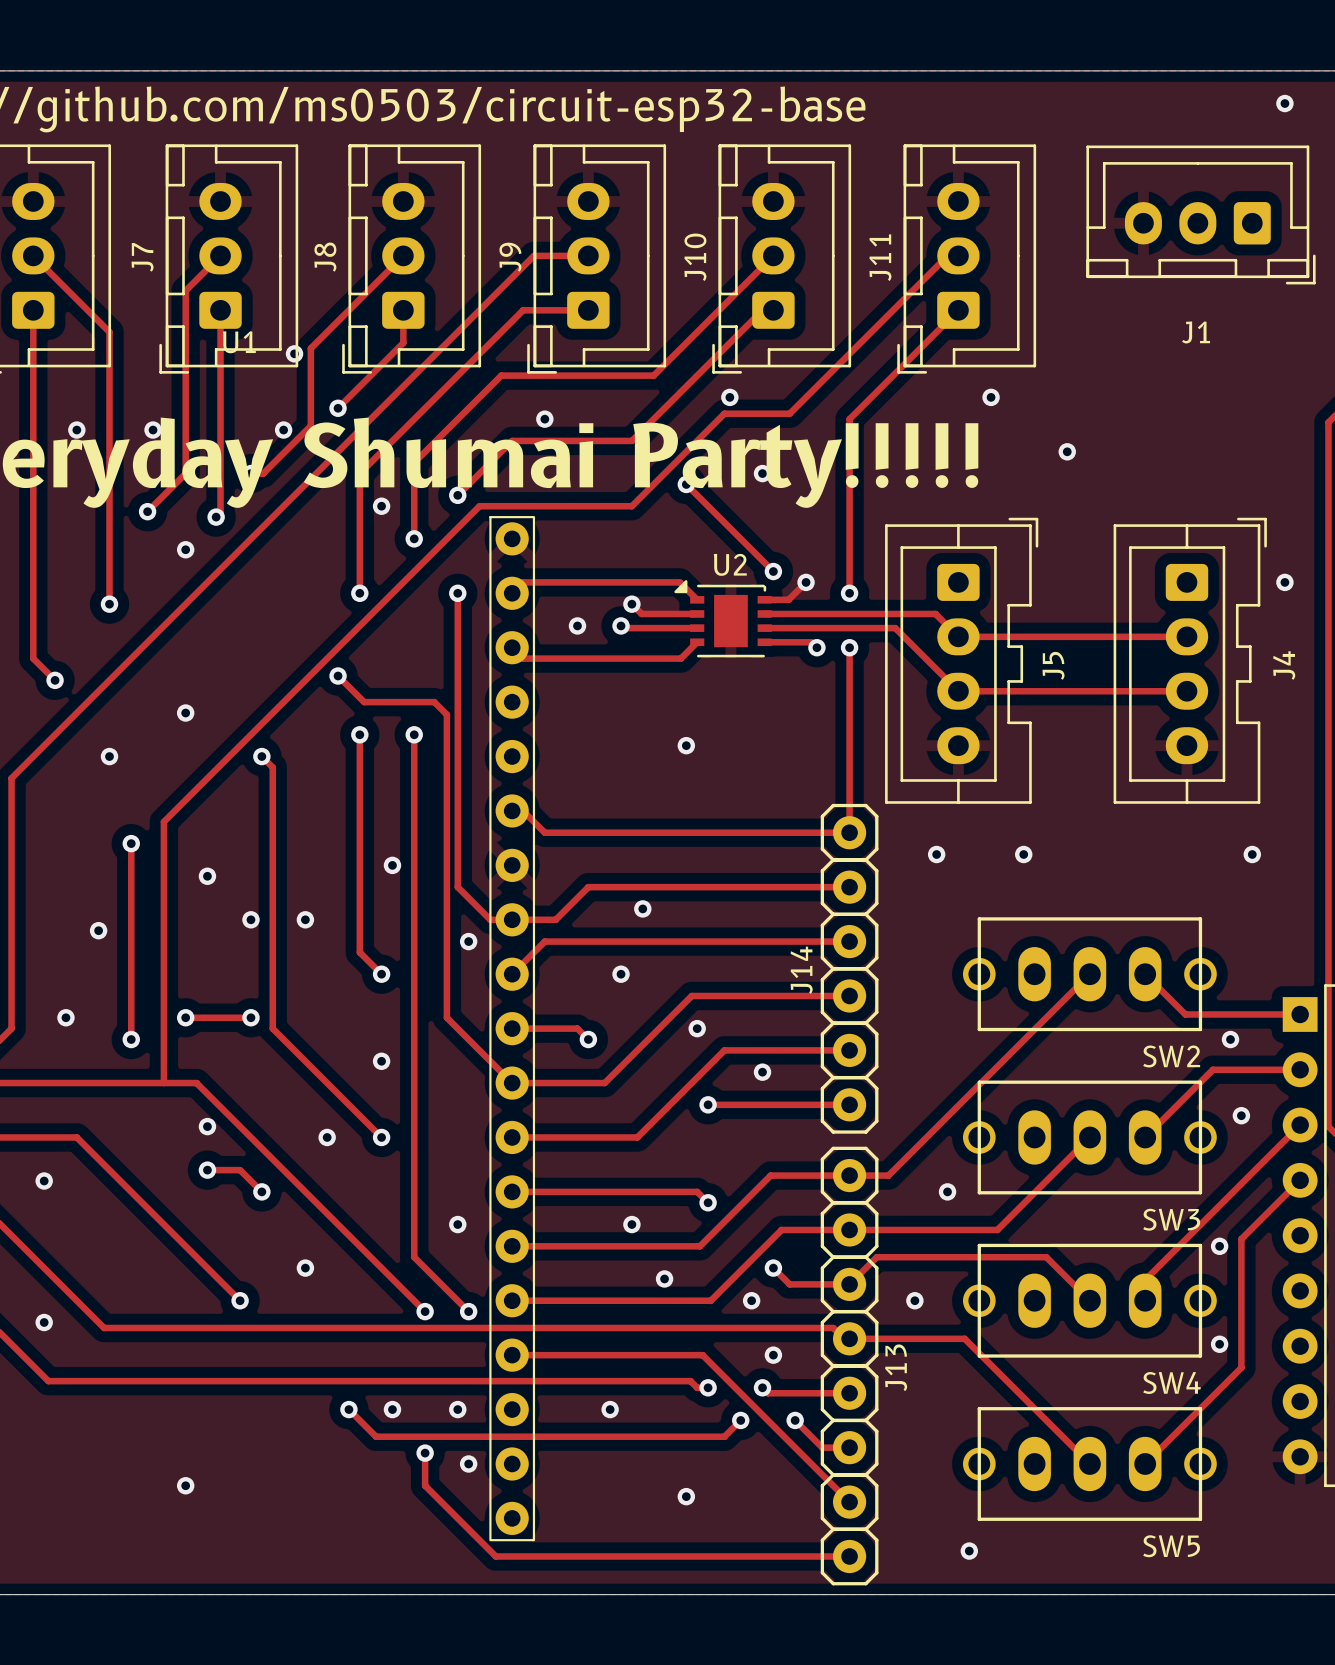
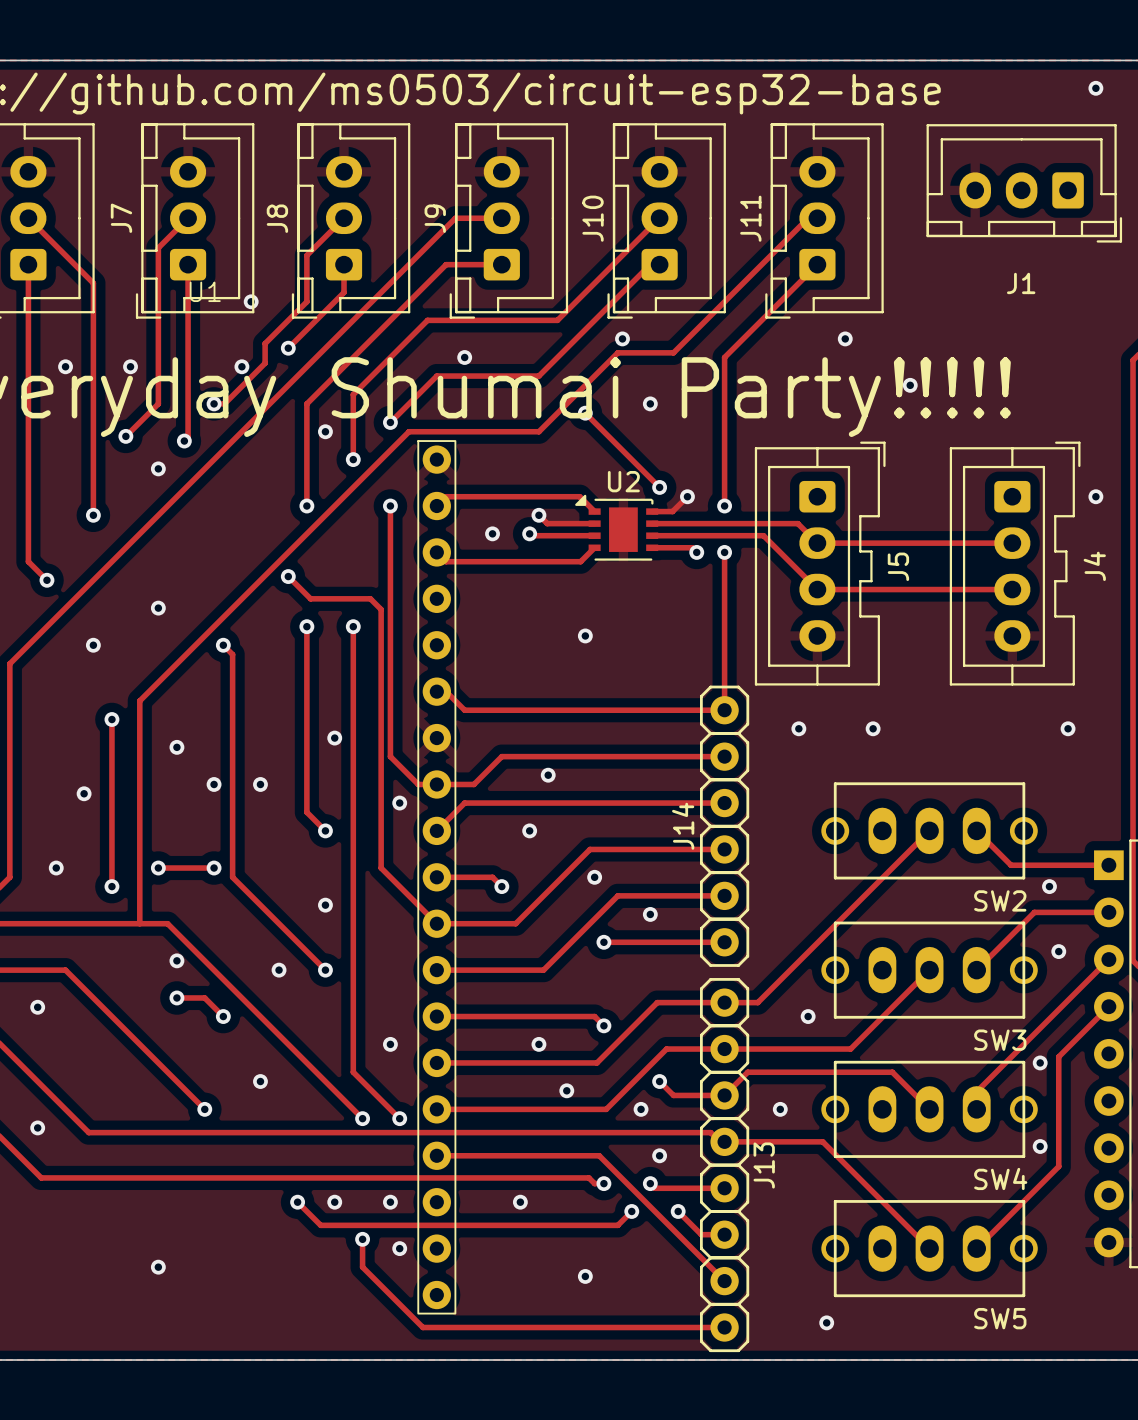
track: (359, 299) (310, 348) (310, 402) -> (306, 255) (306, 301) (265, 343)

